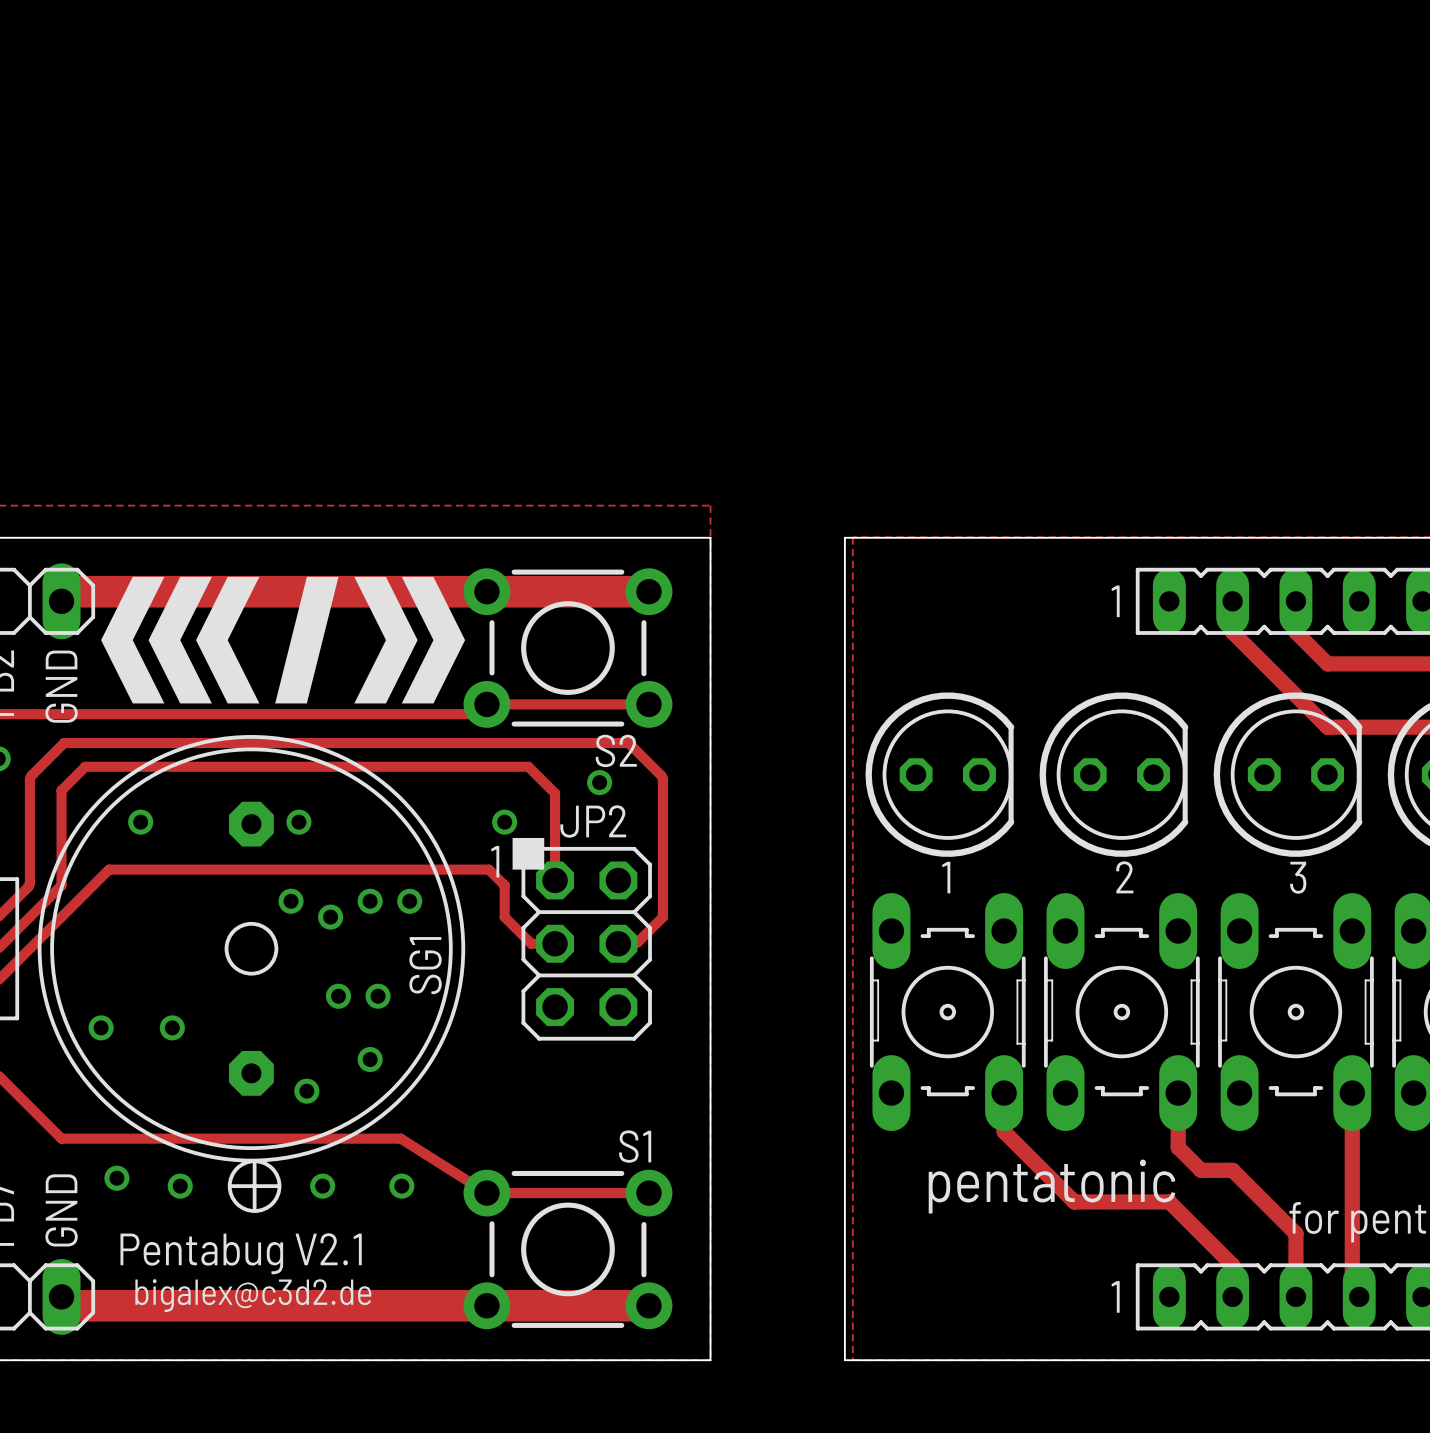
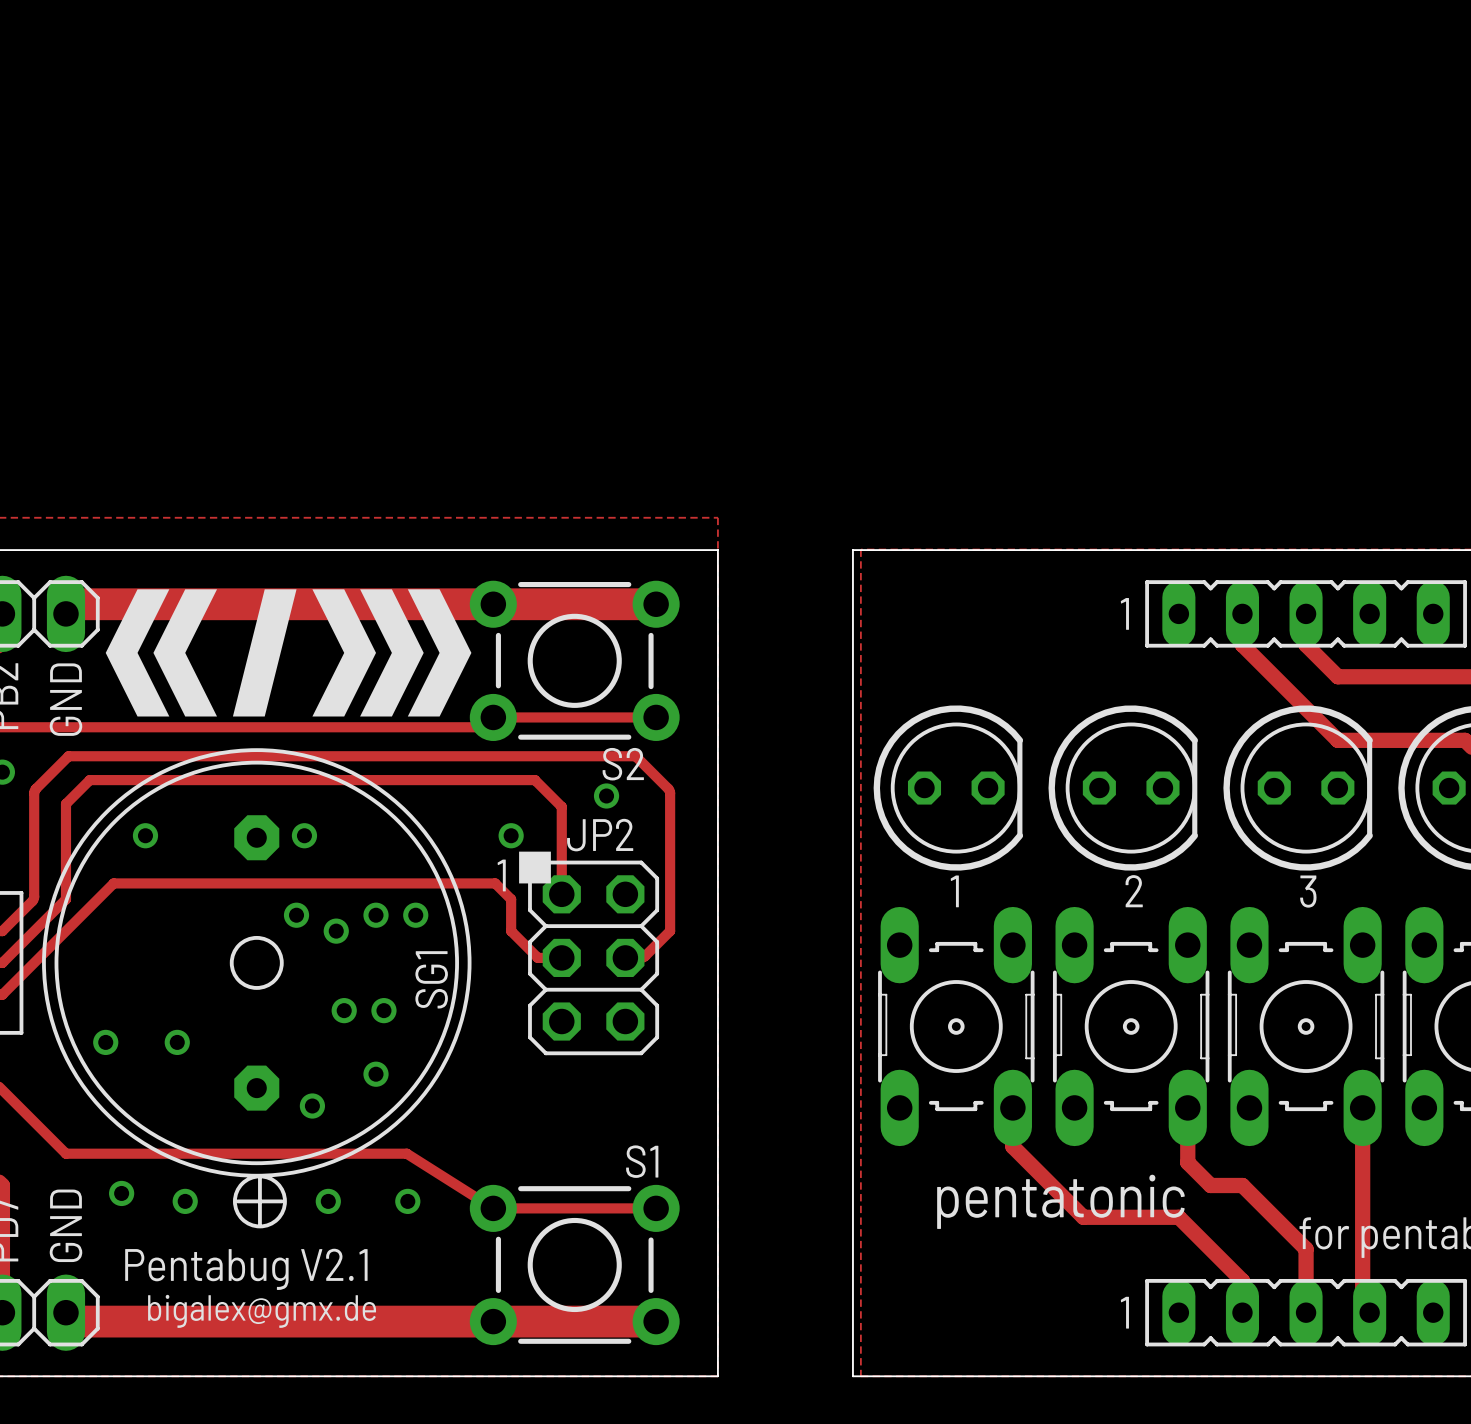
drawing: [196, 576, 260, 704] -> none
drawing: none -> [312, 589, 377, 717]
drawing position: (306, 640) -> (264, 652)
text: bigalex@c3d2.de (253, 1295) -> bigalex@gmx.de (262, 1311)

